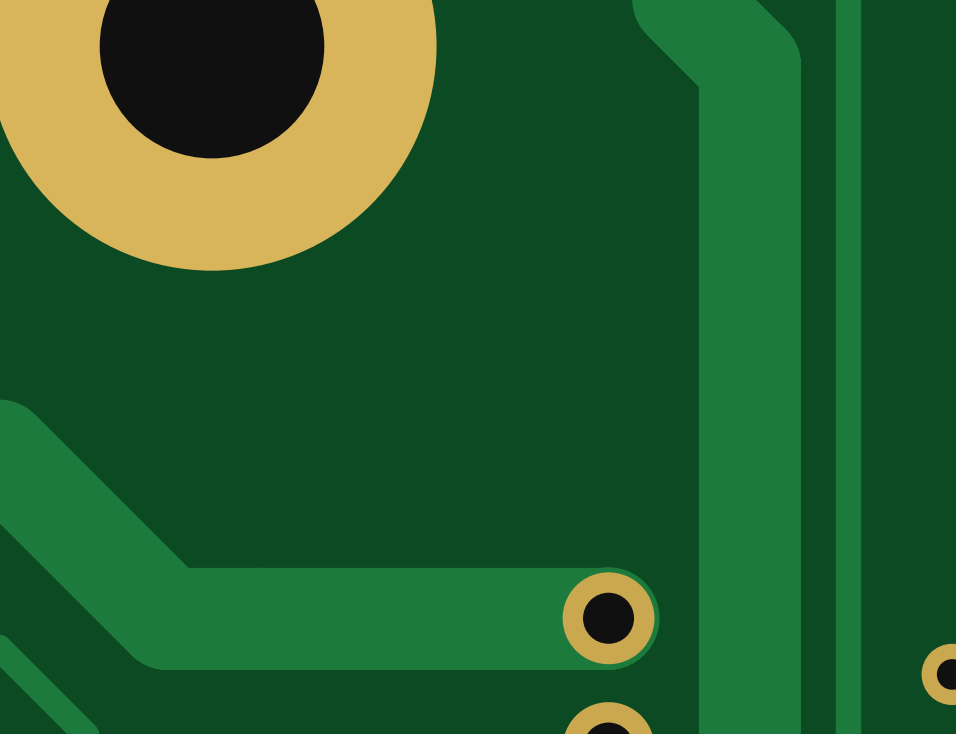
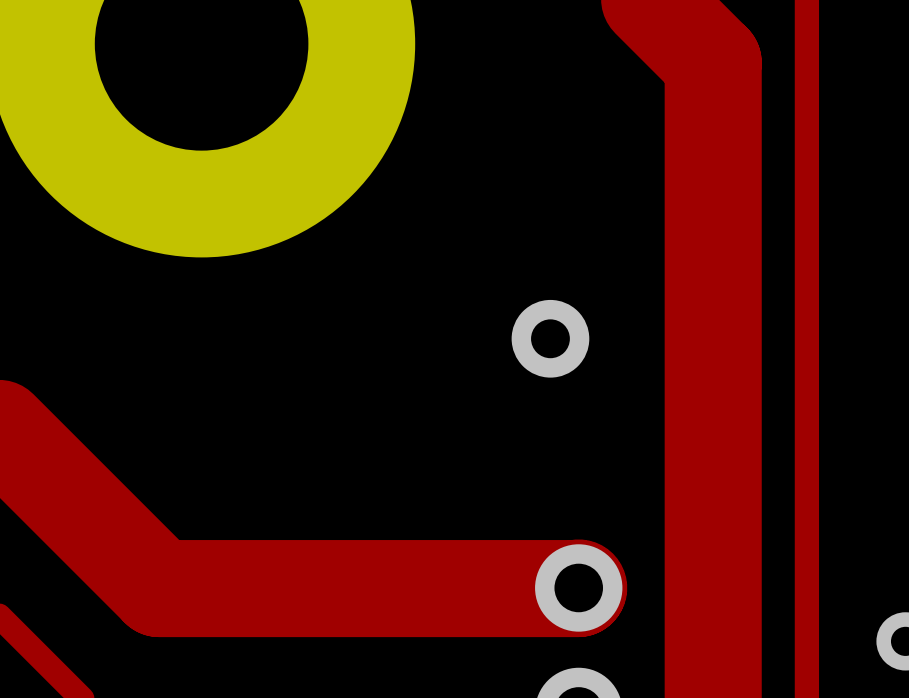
via: none -> (550, 338)

